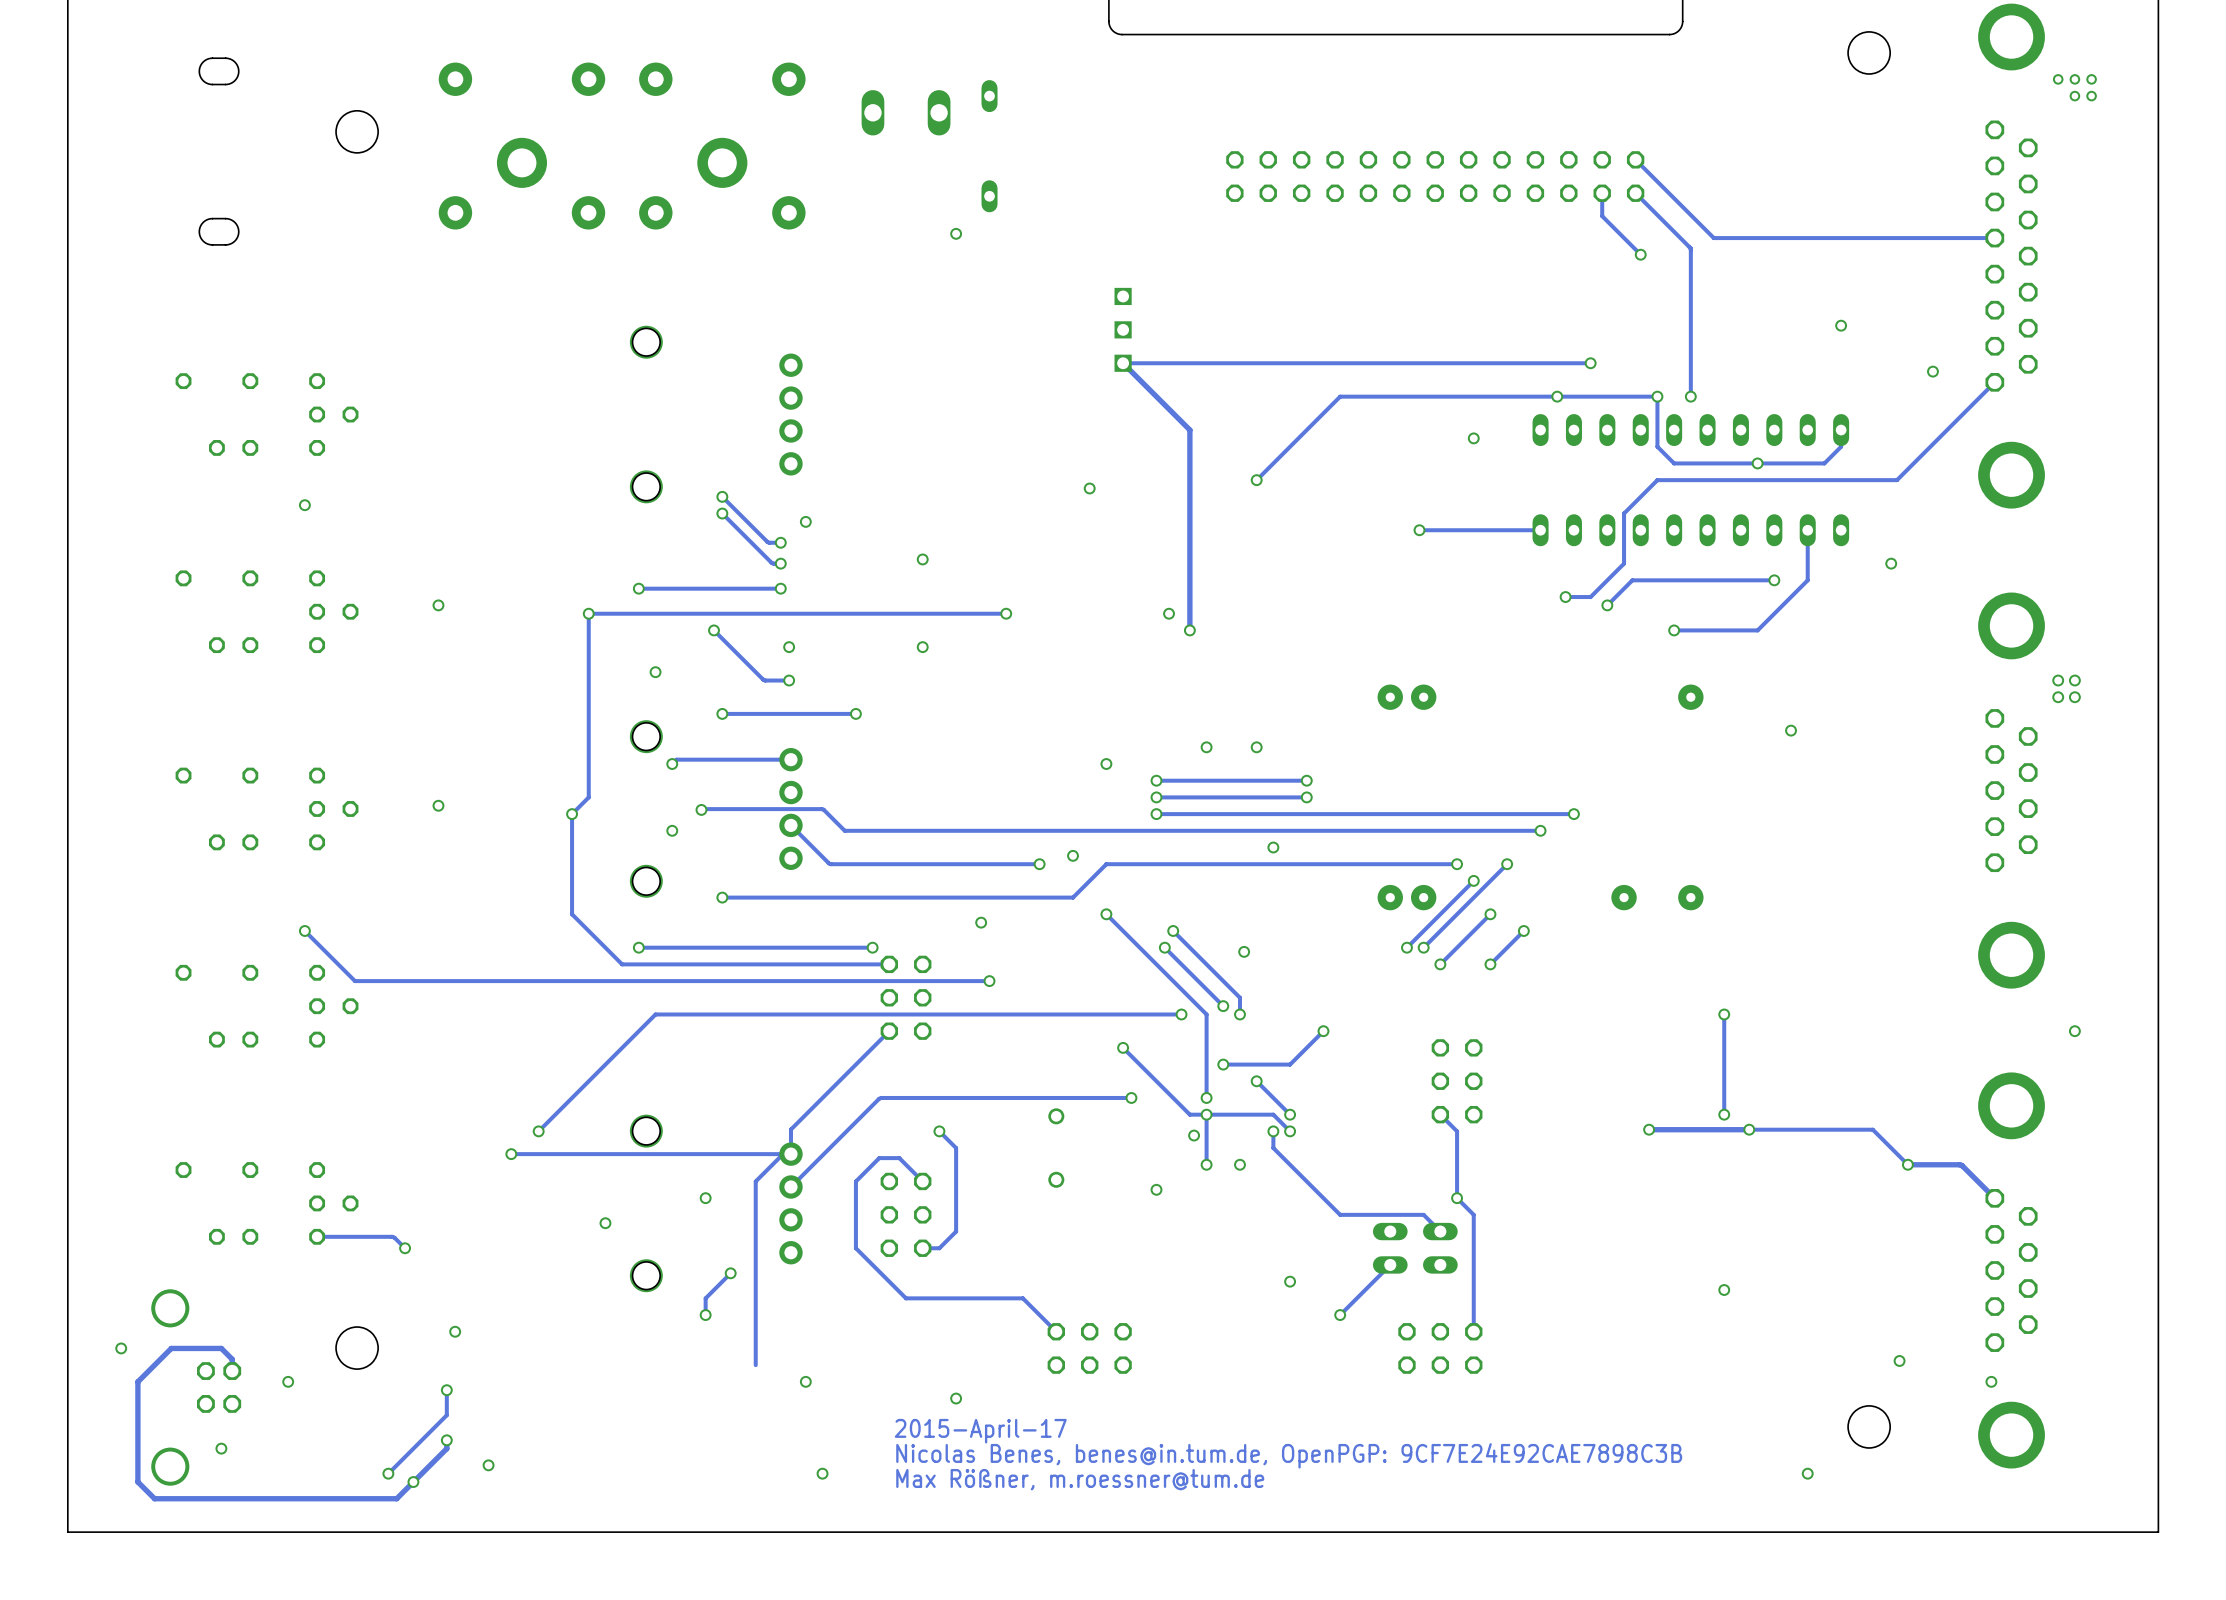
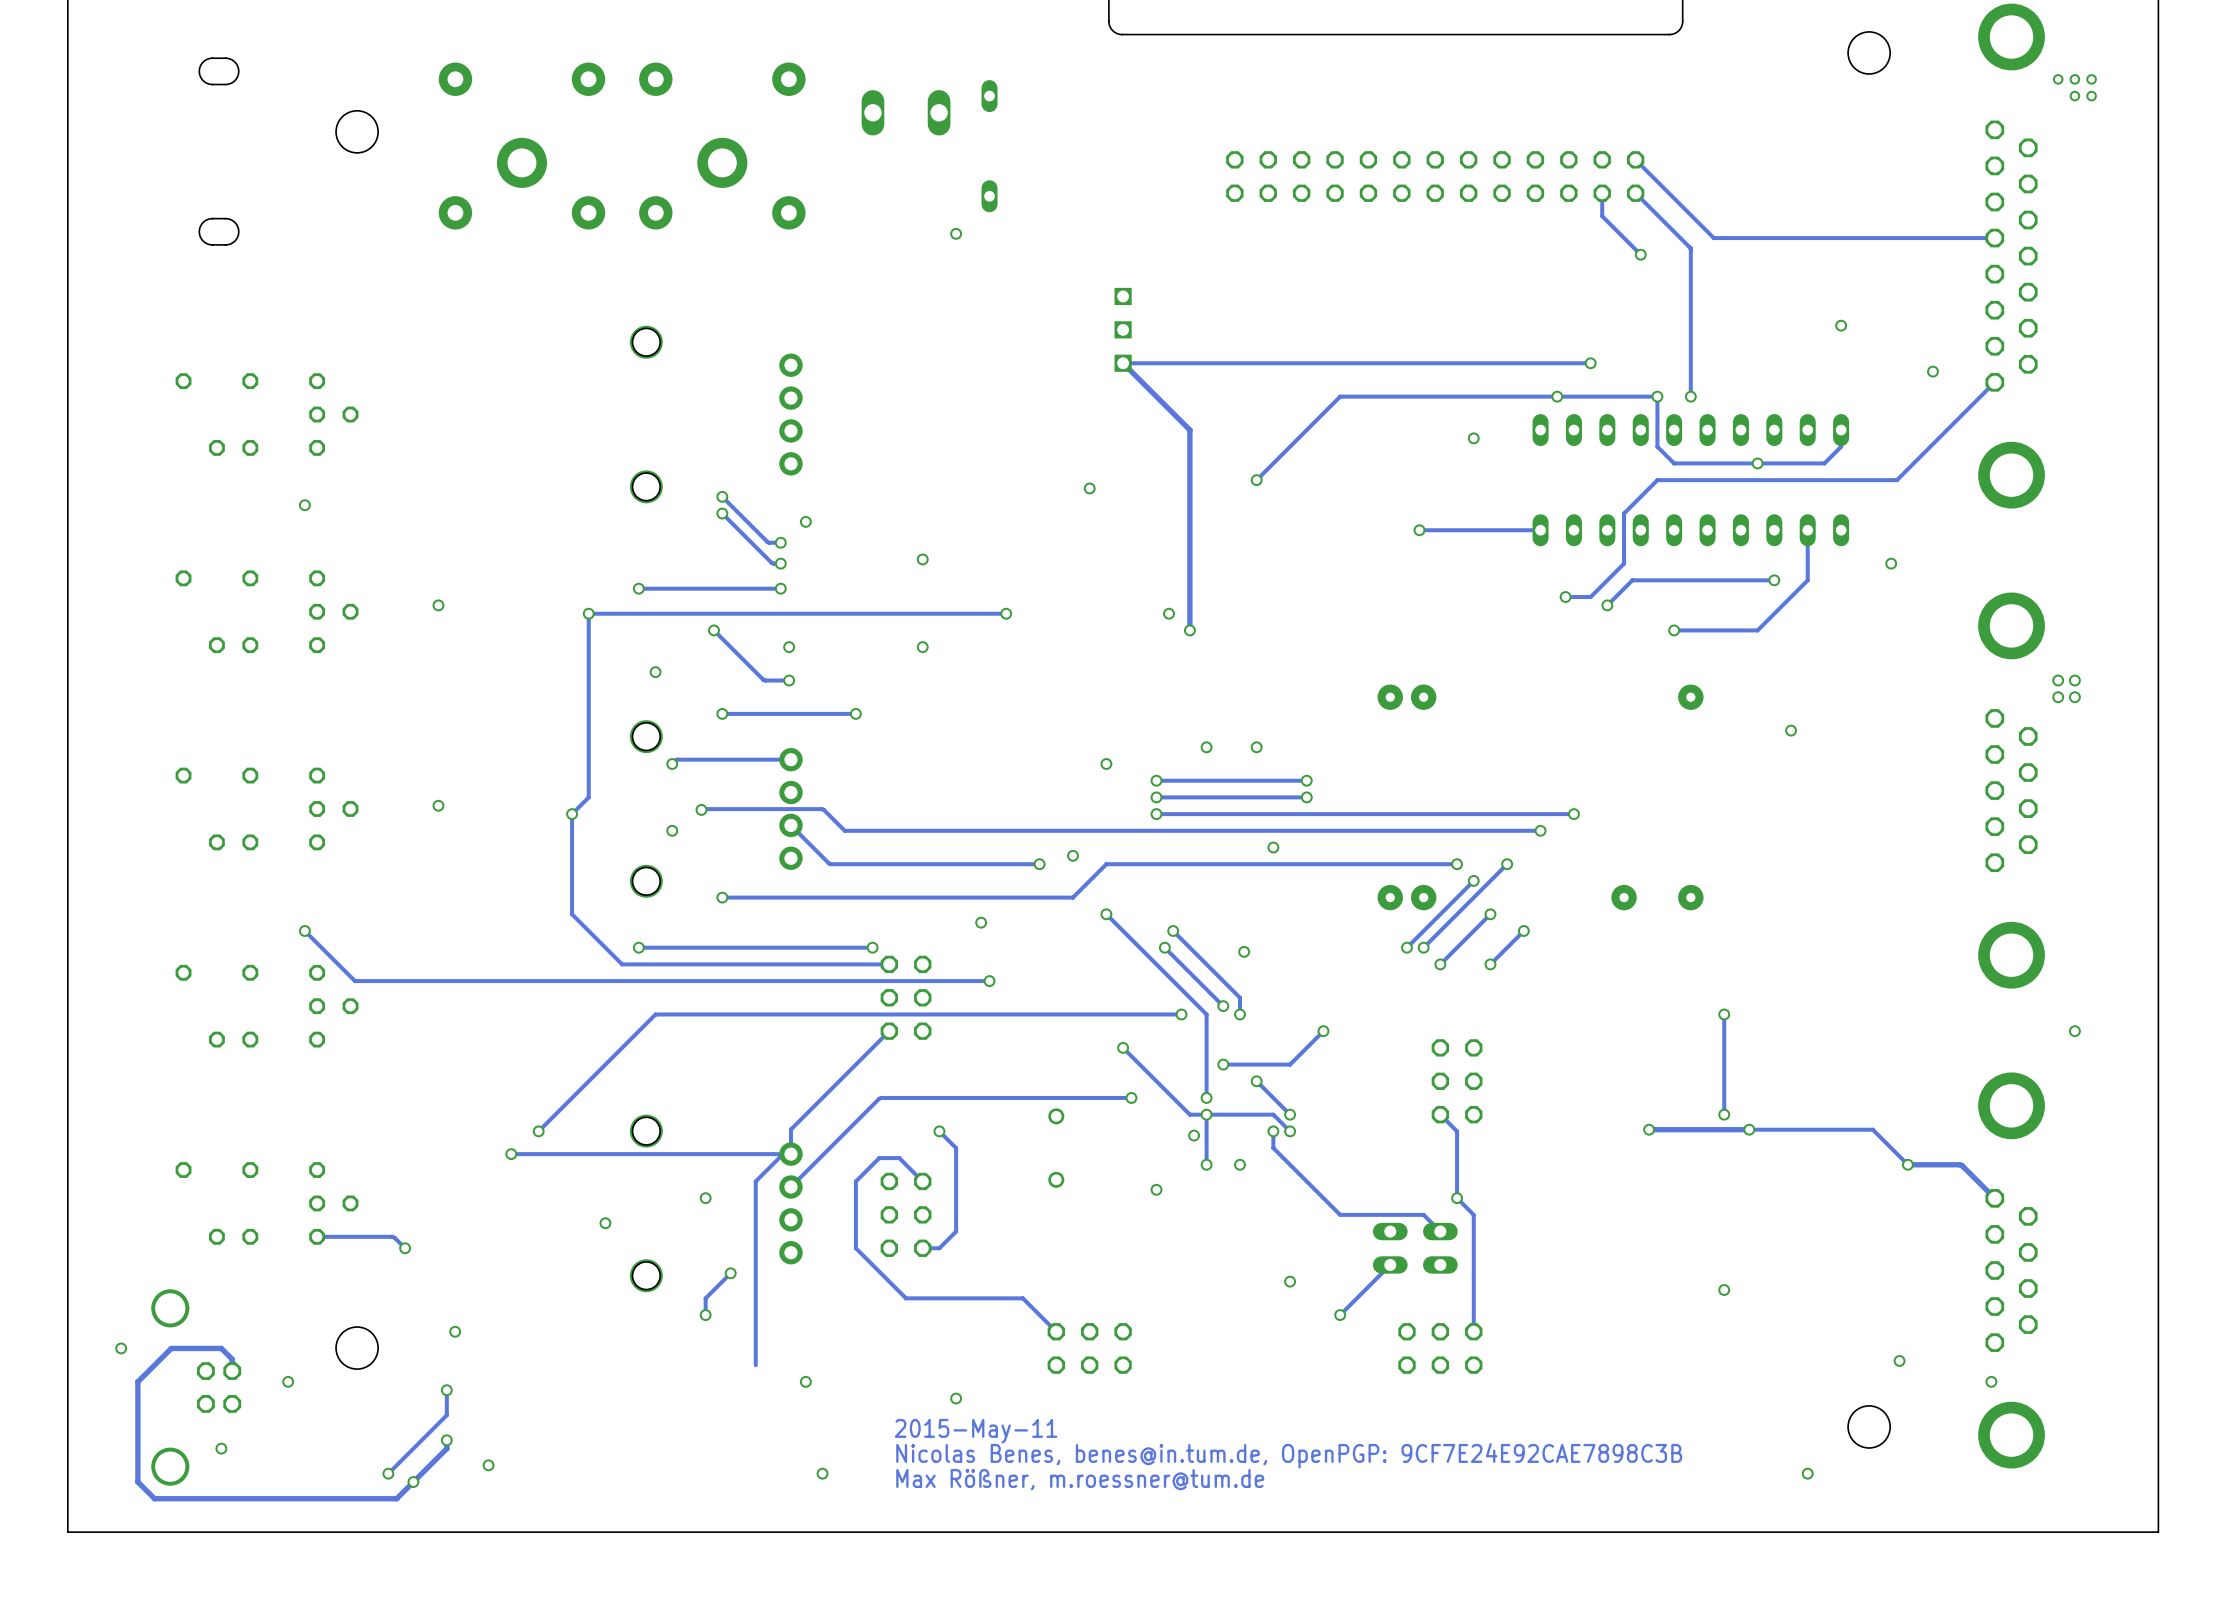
text: 2015-April-17 (980, 1431) -> 2015-May-11 (976, 1431)

